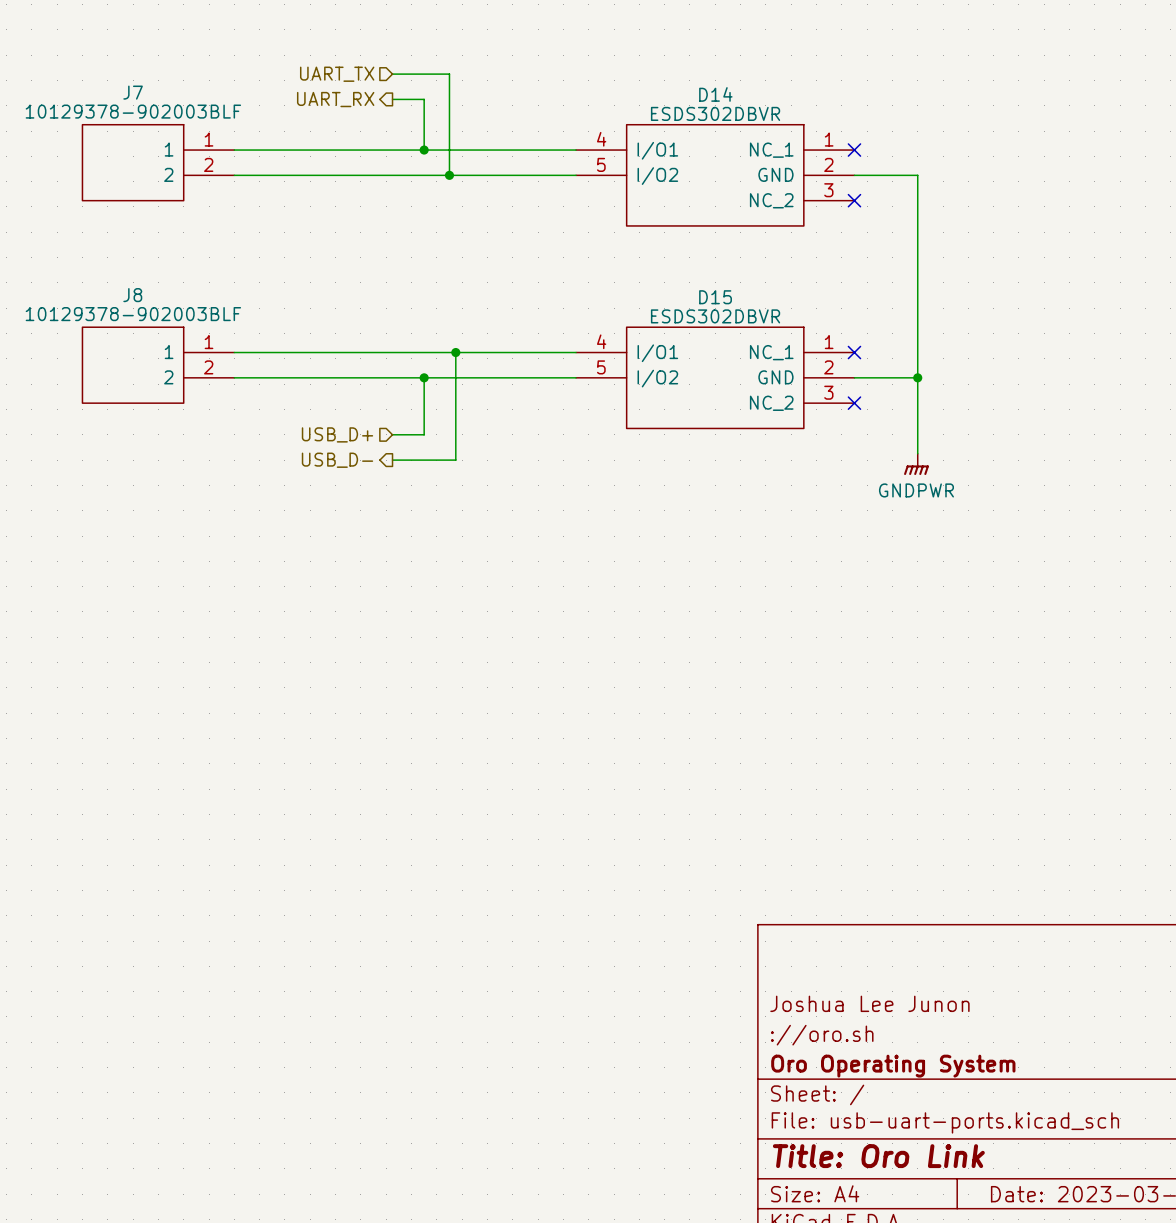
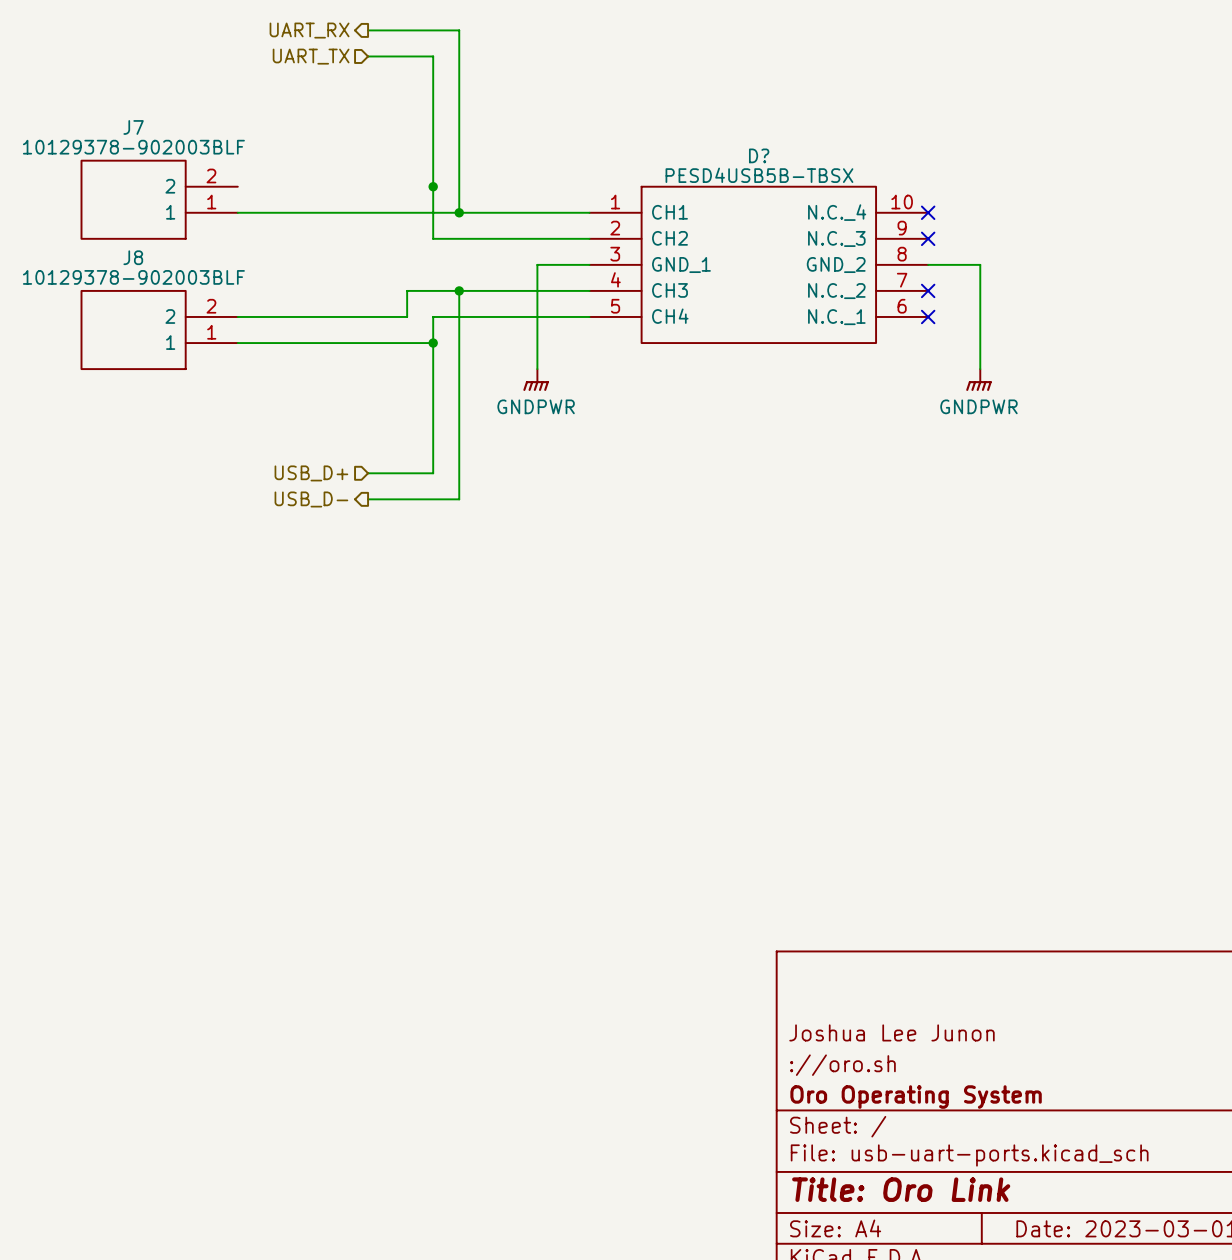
hierarchical label position: UART_TX (337, 74) -> UART_TX (311, 56)
wire: (392, 74) (449, 74) -> (368, 30) (459, 30) (459, 76)
hierarchical label position: UART_RX (335, 99) -> UART_RX (309, 30)
wire: (392, 99) (424, 99) -> (368, 56) (433, 56) (433, 102)
wire: (234, 150) (576, 150) -> none
wire: none -> (433, 154) (433, 238) (589, 238)
junction: (424, 150) -> none
no-connect mark: (854, 150) -> none
J7 flip: as is (133, 162) -> up-down (133, 199)
wire: (234, 175) (576, 175) -> (237, 212) (589, 212)
wire: none -> (459, 180) (459, 212)
junction: (449, 175) -> none
D14: ESDS302DBVR (715, 175) -> none
wire: (854, 175) (917, 175) (917, 453) -> none
junction: none -> (433, 186)
no-connect mark: (854, 200) -> none
junction: none -> (459, 212)
no-connect mark: none -> (928, 212)
no-connect mark: none -> (928, 238)
wire: none -> (589, 264) (537, 264) (537, 369)
D?: none -> PESD4USB5B-TBSX (758, 264)
wire: none -> (928, 264) (980, 264) (980, 369)
wire: none -> (459, 290) (459, 499) (368, 499)
junction: none -> (459, 290)
wire: none -> (589, 290) (407, 290) (407, 316) (237, 316)
no-connect mark: none -> (928, 290)
wire: none -> (589, 316) (433, 316) (433, 388)
no-connect mark: none -> (928, 316)
wire: none -> (237, 343) (433, 343)
junction: none -> (433, 343)
wire: (234, 352) (576, 352) -> none
wire: (455, 352) (455, 460) (424, 460) -> none
junction: (455, 352) -> none
no-connect mark: (854, 352) -> none
J8 flip: as is (133, 365) -> up-down (133, 330)
power symbol: none -> GNDPWR (536, 380)
wire: (234, 377) (576, 377) -> none
junction: (424, 377) -> none
D15: ESDS302DBVR (715, 377) -> none
wire: (854, 377) (917, 377) -> none
junction: (917, 377) -> none
no-connect mark: (854, 403) -> none
hierarchical label position: USB_D+ (337, 434) -> USB_D+ (311, 473)
wire: (392, 434) (424, 434) -> (433, 473) (433, 447)
hierarchical label position: USB_D- (337, 460) -> USB_D- (311, 499)
wire: none -> (368, 473) (400, 473)
power symbol position: GNDPWR (916, 464) -> GNDPWR (978, 380)

